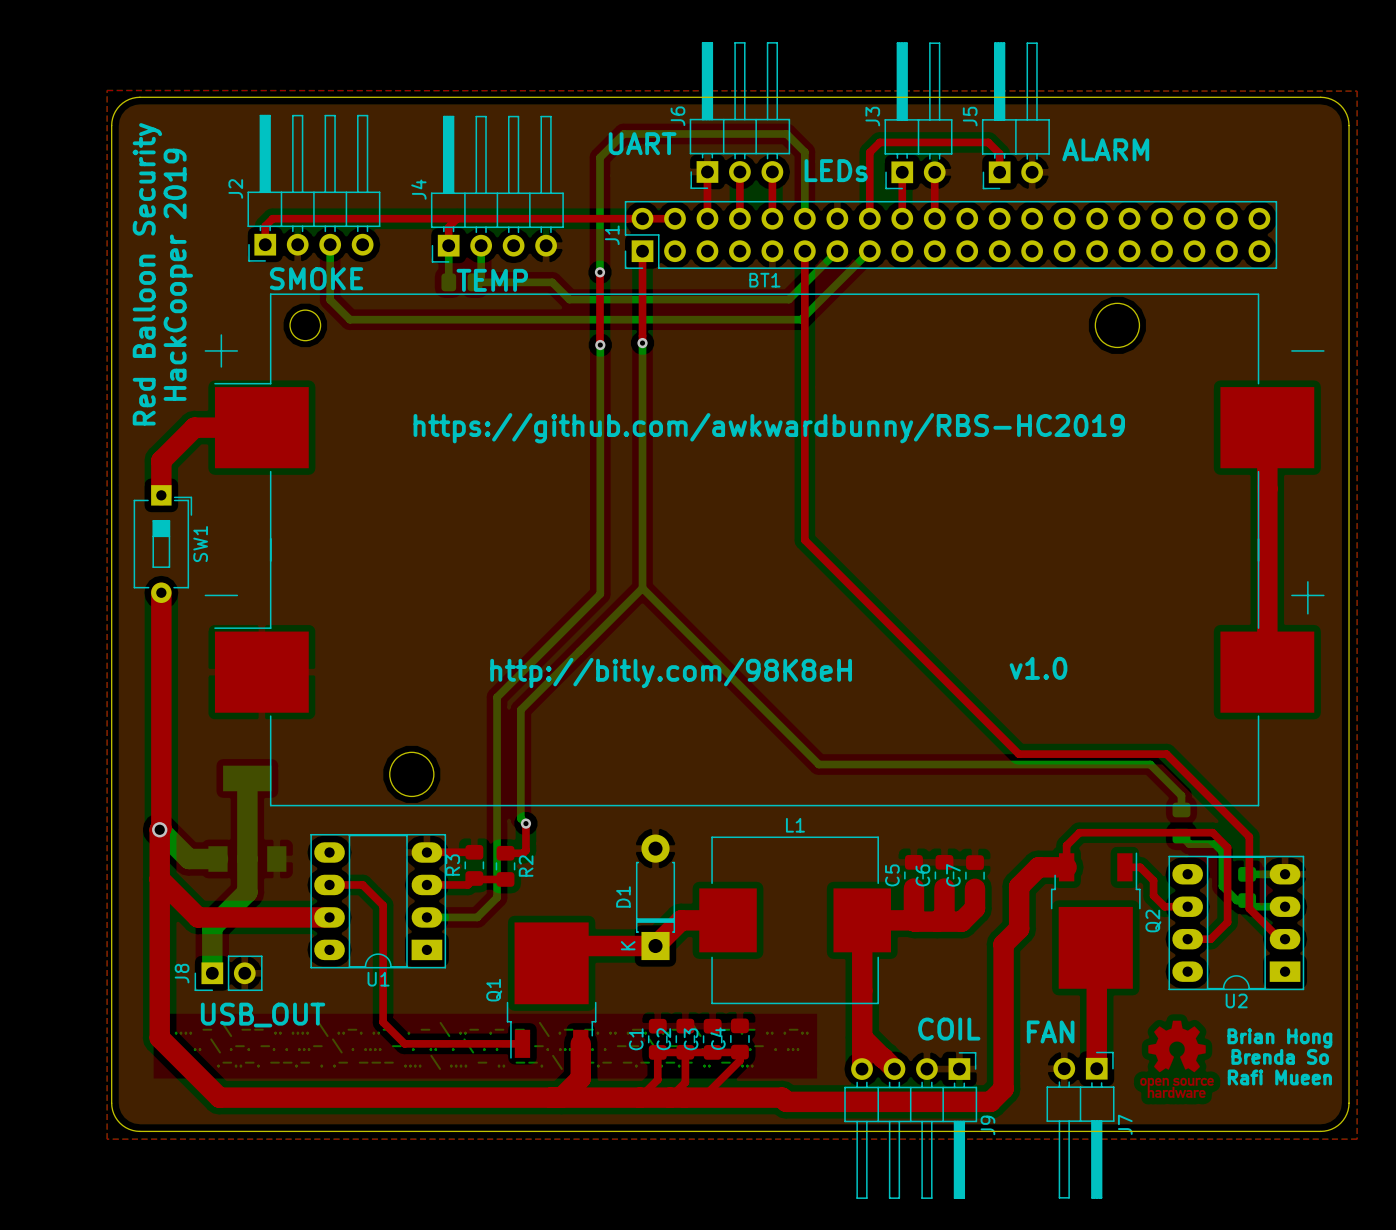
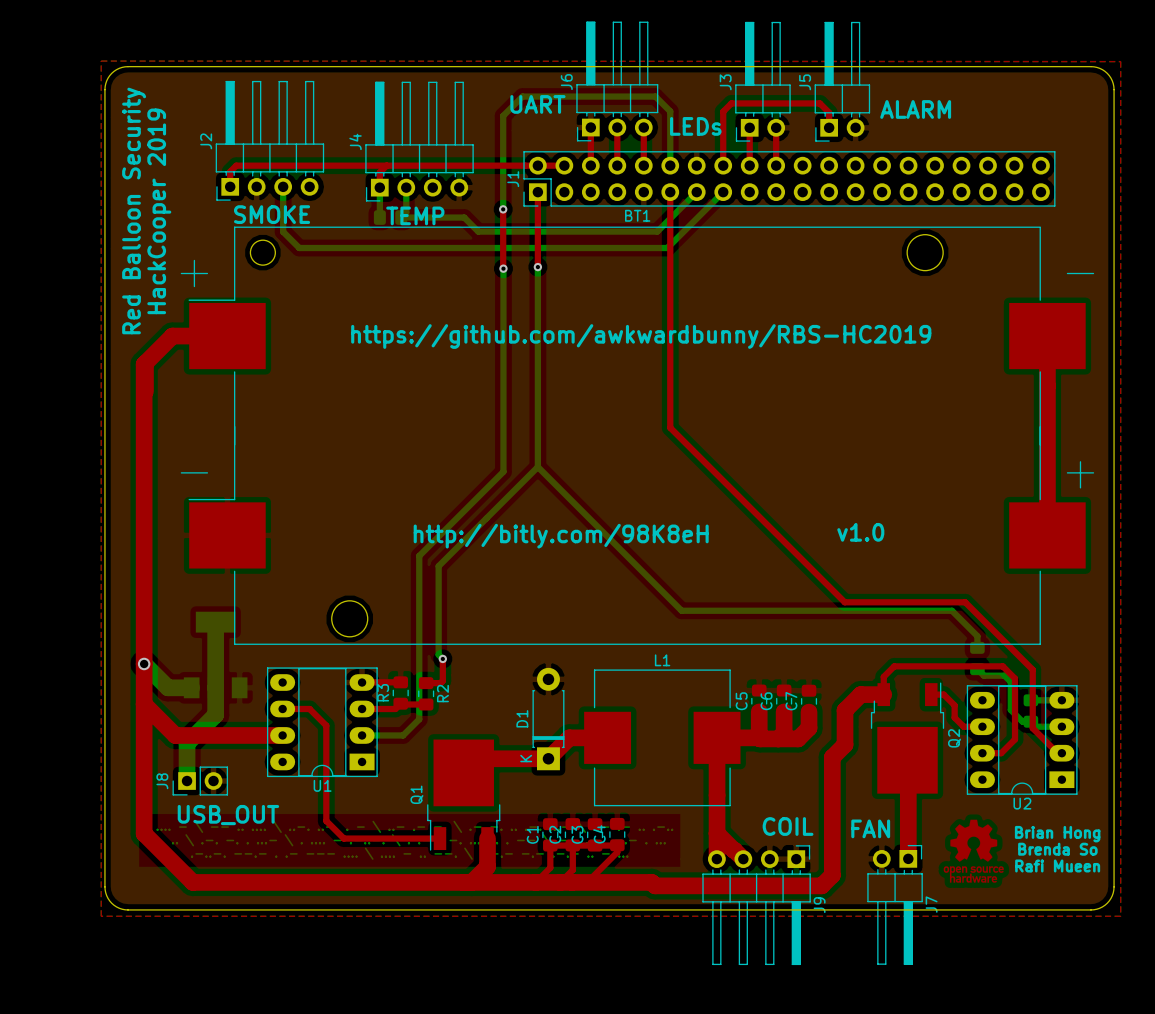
SW1: (162, 544) -> none
top track: (161, 592) (161, 828) (159, 829) -> (145, 363) (144, 663)

